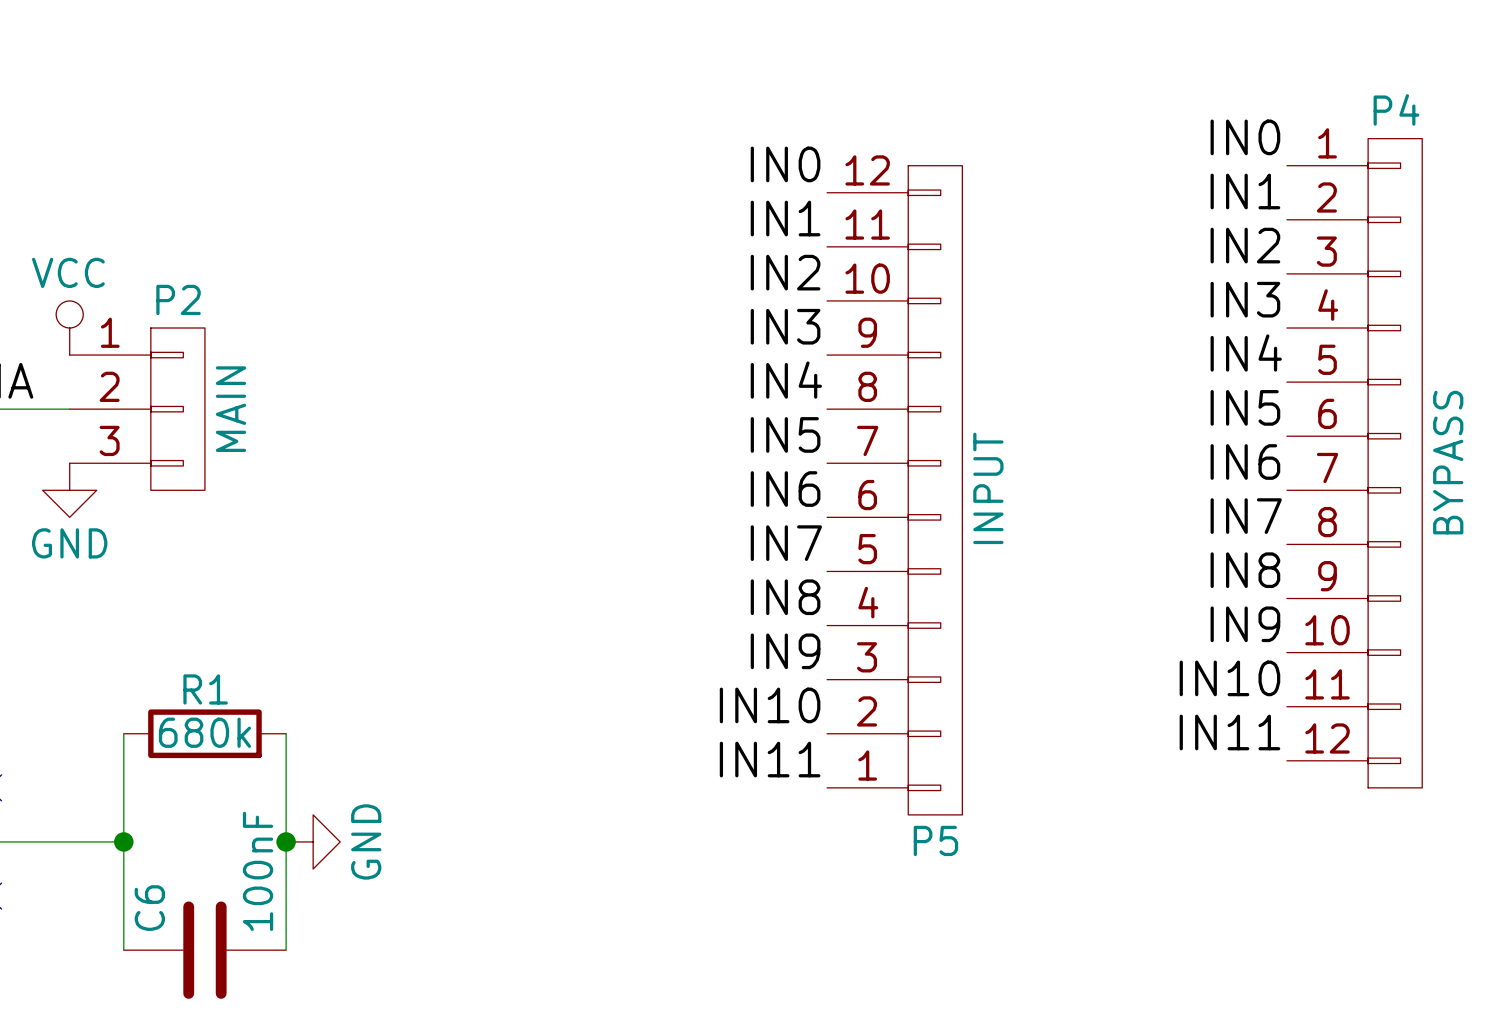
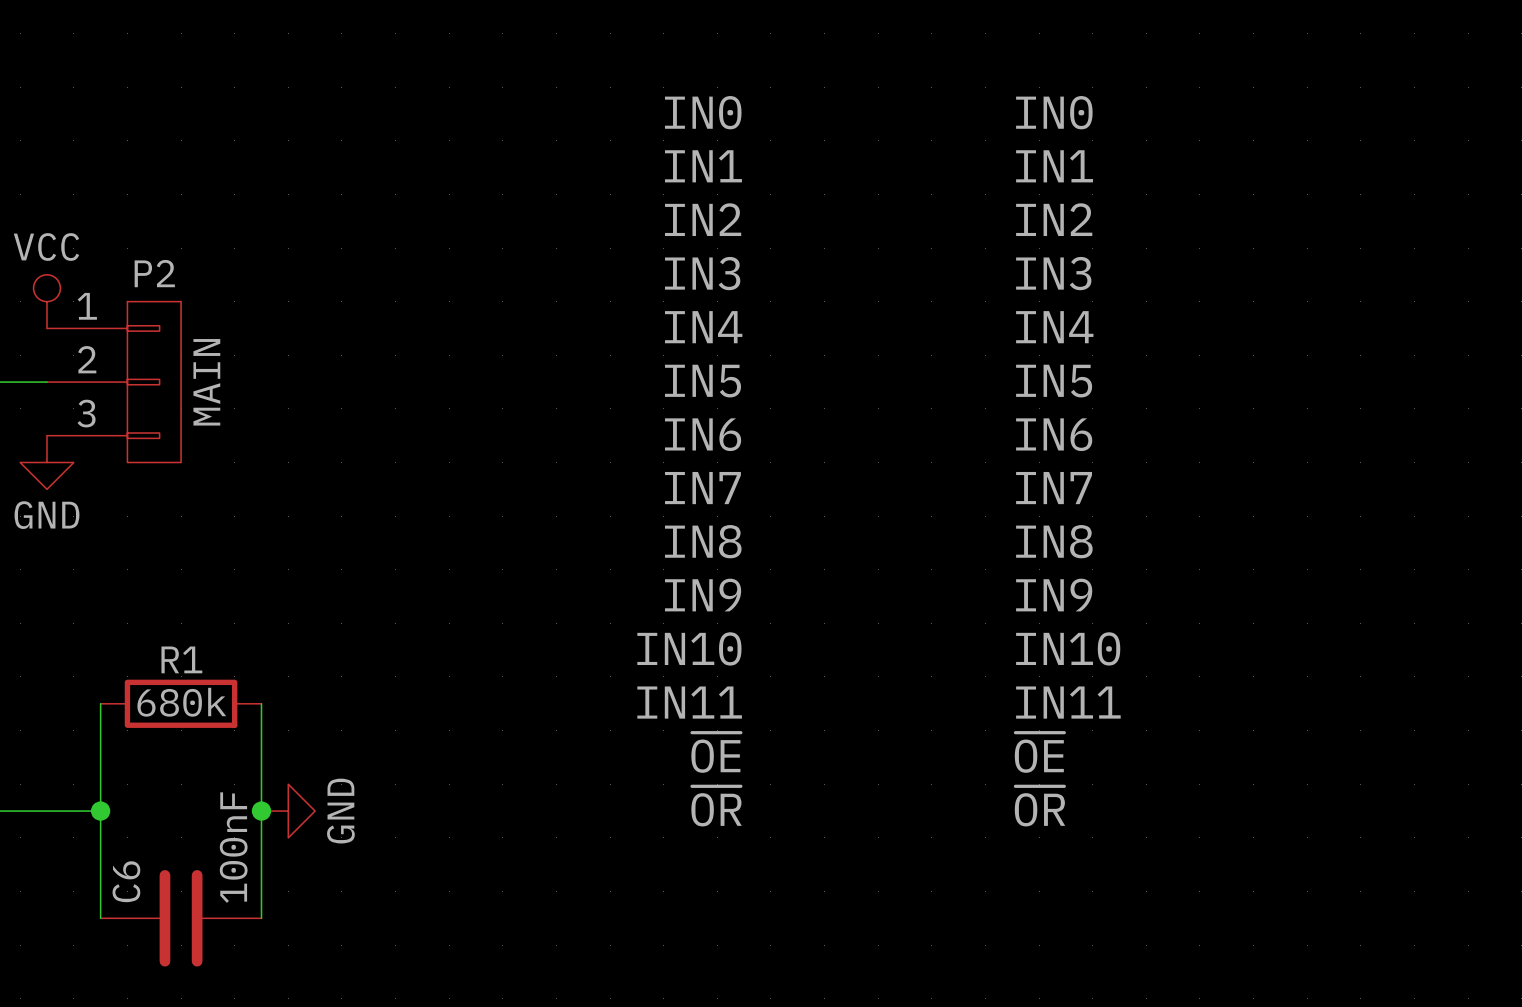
label: none -> IN0 (1054, 112)
label: IN0 (1245, 137) -> none
label position: IN0 (785, 164) -> IN0 (703, 112)
label: none -> IN1 (1054, 166)
label: IN1 (1245, 191) -> none
label position: IN1 (785, 218) -> IN1 (703, 166)
label: none -> IN2 (1054, 219)
label: IN2 (1245, 245) -> none
label position: IN2 (785, 272) -> IN2 (703, 219)
label: none -> IN3 (1053, 273)
label: IN3 (1245, 299) -> none
label position: IN3 (785, 326) -> IN3 (702, 273)
label: none -> IN4 (1054, 327)
label: IN4 (1246, 353) -> none
label position: IN4 (786, 380) -> IN4 (703, 327)
label: none -> IN5 (1054, 381)
label: IN5 (1245, 407) -> none
label position: IN5 (785, 434) -> IN5 (703, 381)
label: none -> IN6 (1054, 434)
label: IN6 (1245, 461) -> none
P4: BYPASS (1354, 463) -> none
label position: IN6 (785, 489) -> IN6 (703, 434)
P5: INPUT (894, 490) -> none
label: none -> IN7 (1054, 488)
label: IN7 (1246, 516) -> none
label position: IN7 (786, 543) -> IN7 (702, 488)
label: none -> IN8 (1054, 541)
label: IN8 (1245, 570) -> none
label position: IN8 (785, 597) -> IN8 (703, 541)
label: none -> IN9 (1054, 595)
label: IN9 (1245, 624) -> none
label position: IN9 (785, 651) -> IN9 (703, 595)
label: none -> IN10 (1068, 648)
label: IN10 (1229, 678) -> none
label position: IN10 (770, 705) -> IN10 (689, 648)
label: none -> IN11 (1068, 702)
label: IN11 (1229, 732) -> none
label position: IN11 (770, 759) -> IN11 (689, 702)
label: none -> ~{OE} (716, 752)
label: none -> ~{OE} (1039, 752)
label: none -> ~{OR} (716, 806)
label: none -> ~{OR} (1039, 806)

